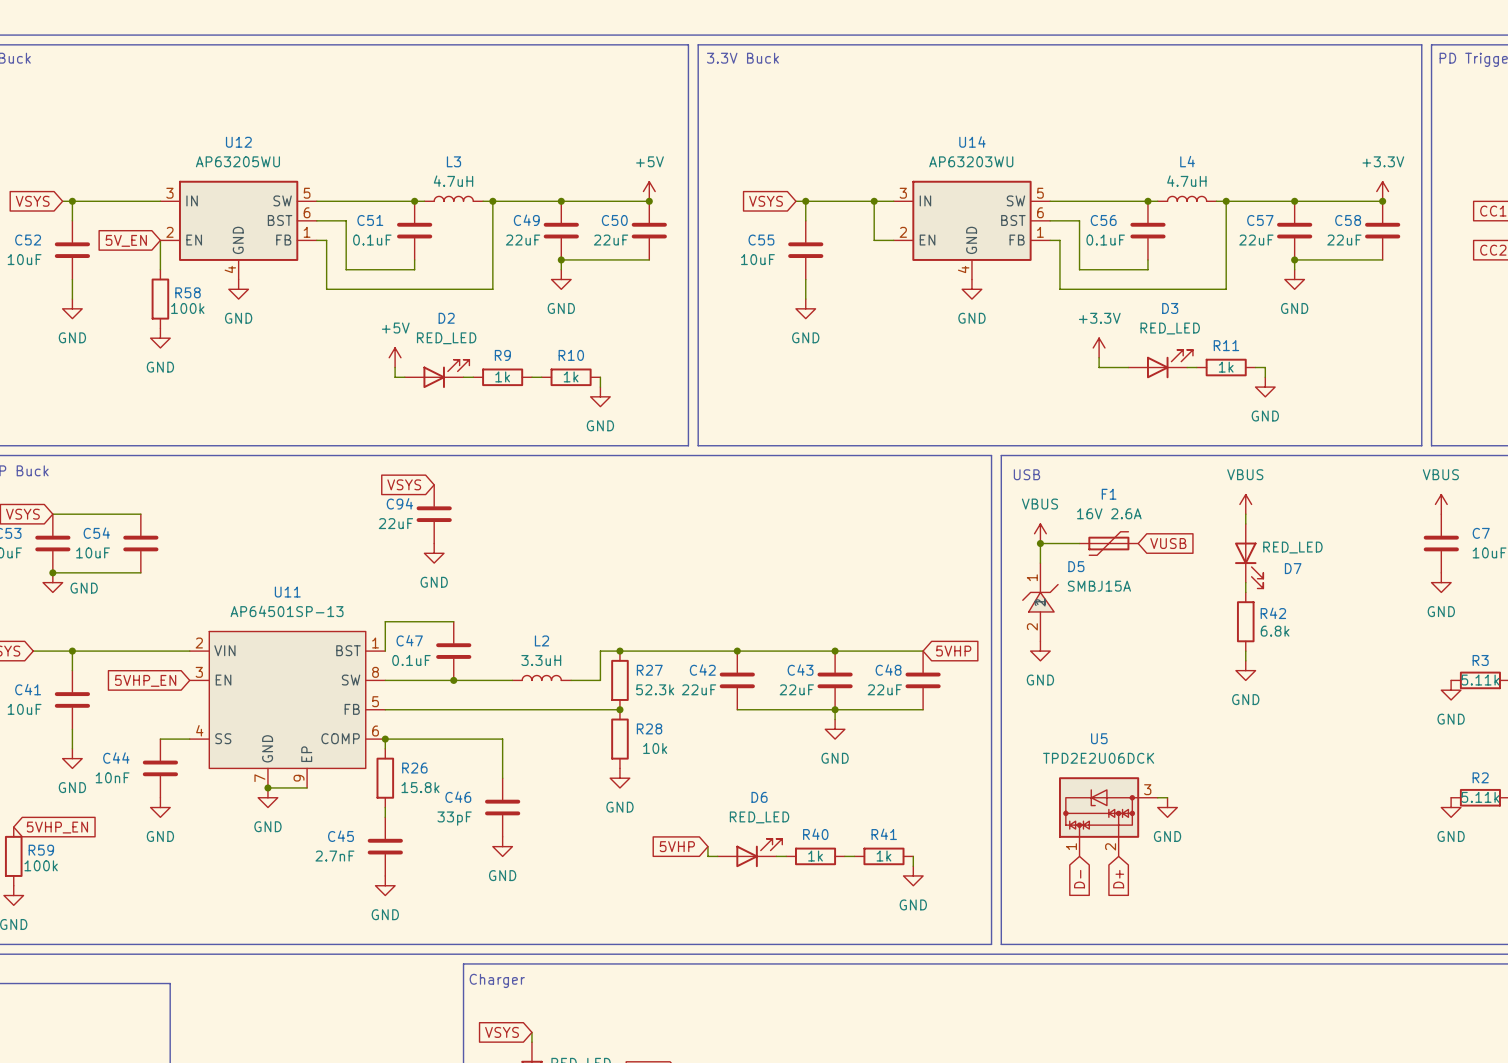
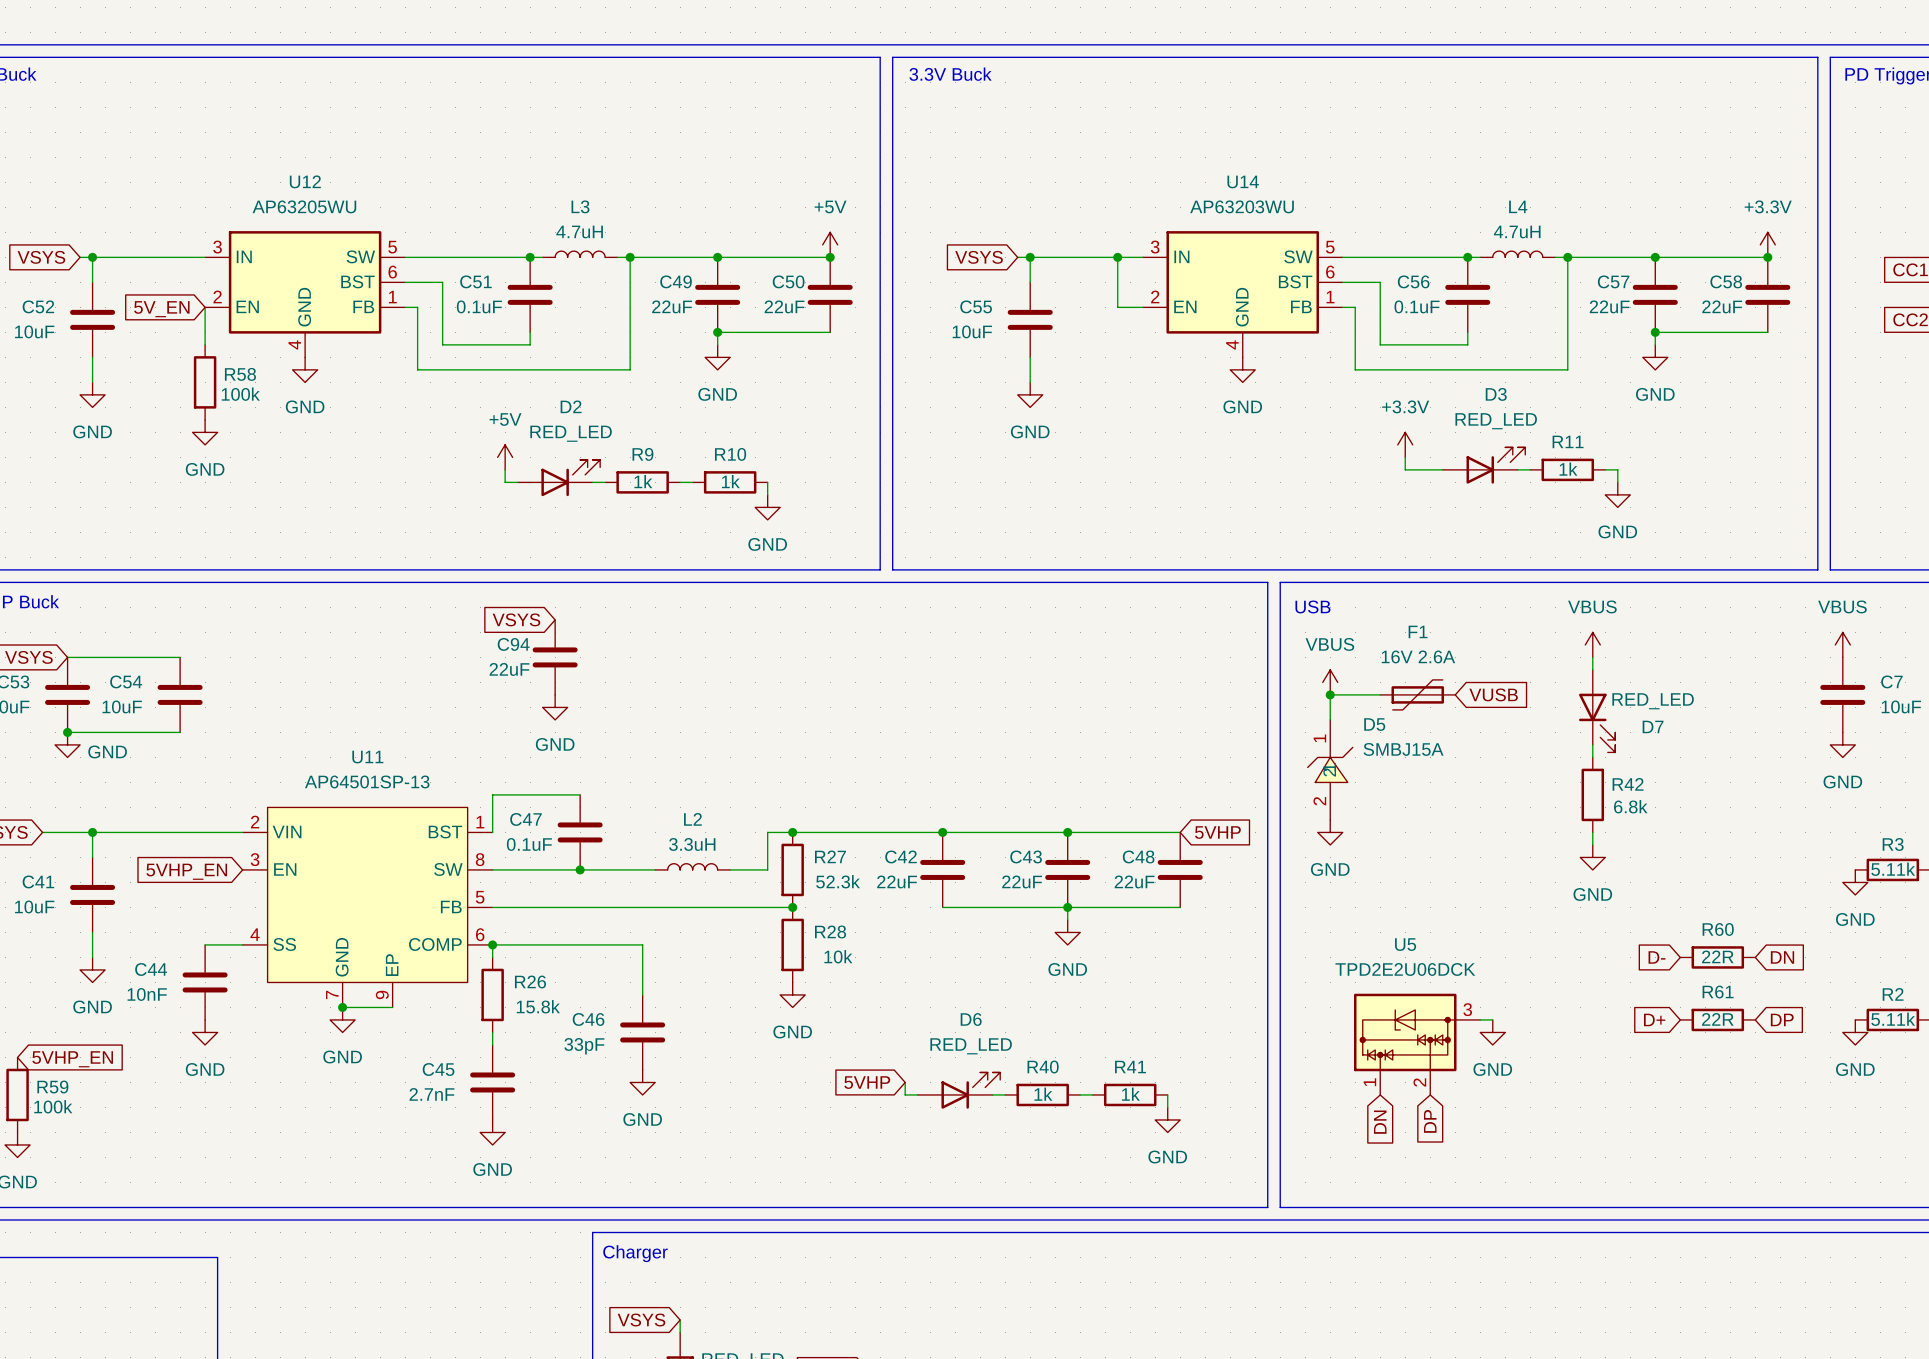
global label: none -> D- (1656, 957)
R60: none -> 22R (1717, 957)
global label: none -> DN (1782, 957)
global label: none -> D+ (1654, 1019)
R61: none -> 22R (1717, 1019)
global label: none -> DP (1782, 1019)
global label: D- (1079, 879) -> DN (1380, 1122)
global label: D+ (1118, 879) -> DP (1430, 1121)

